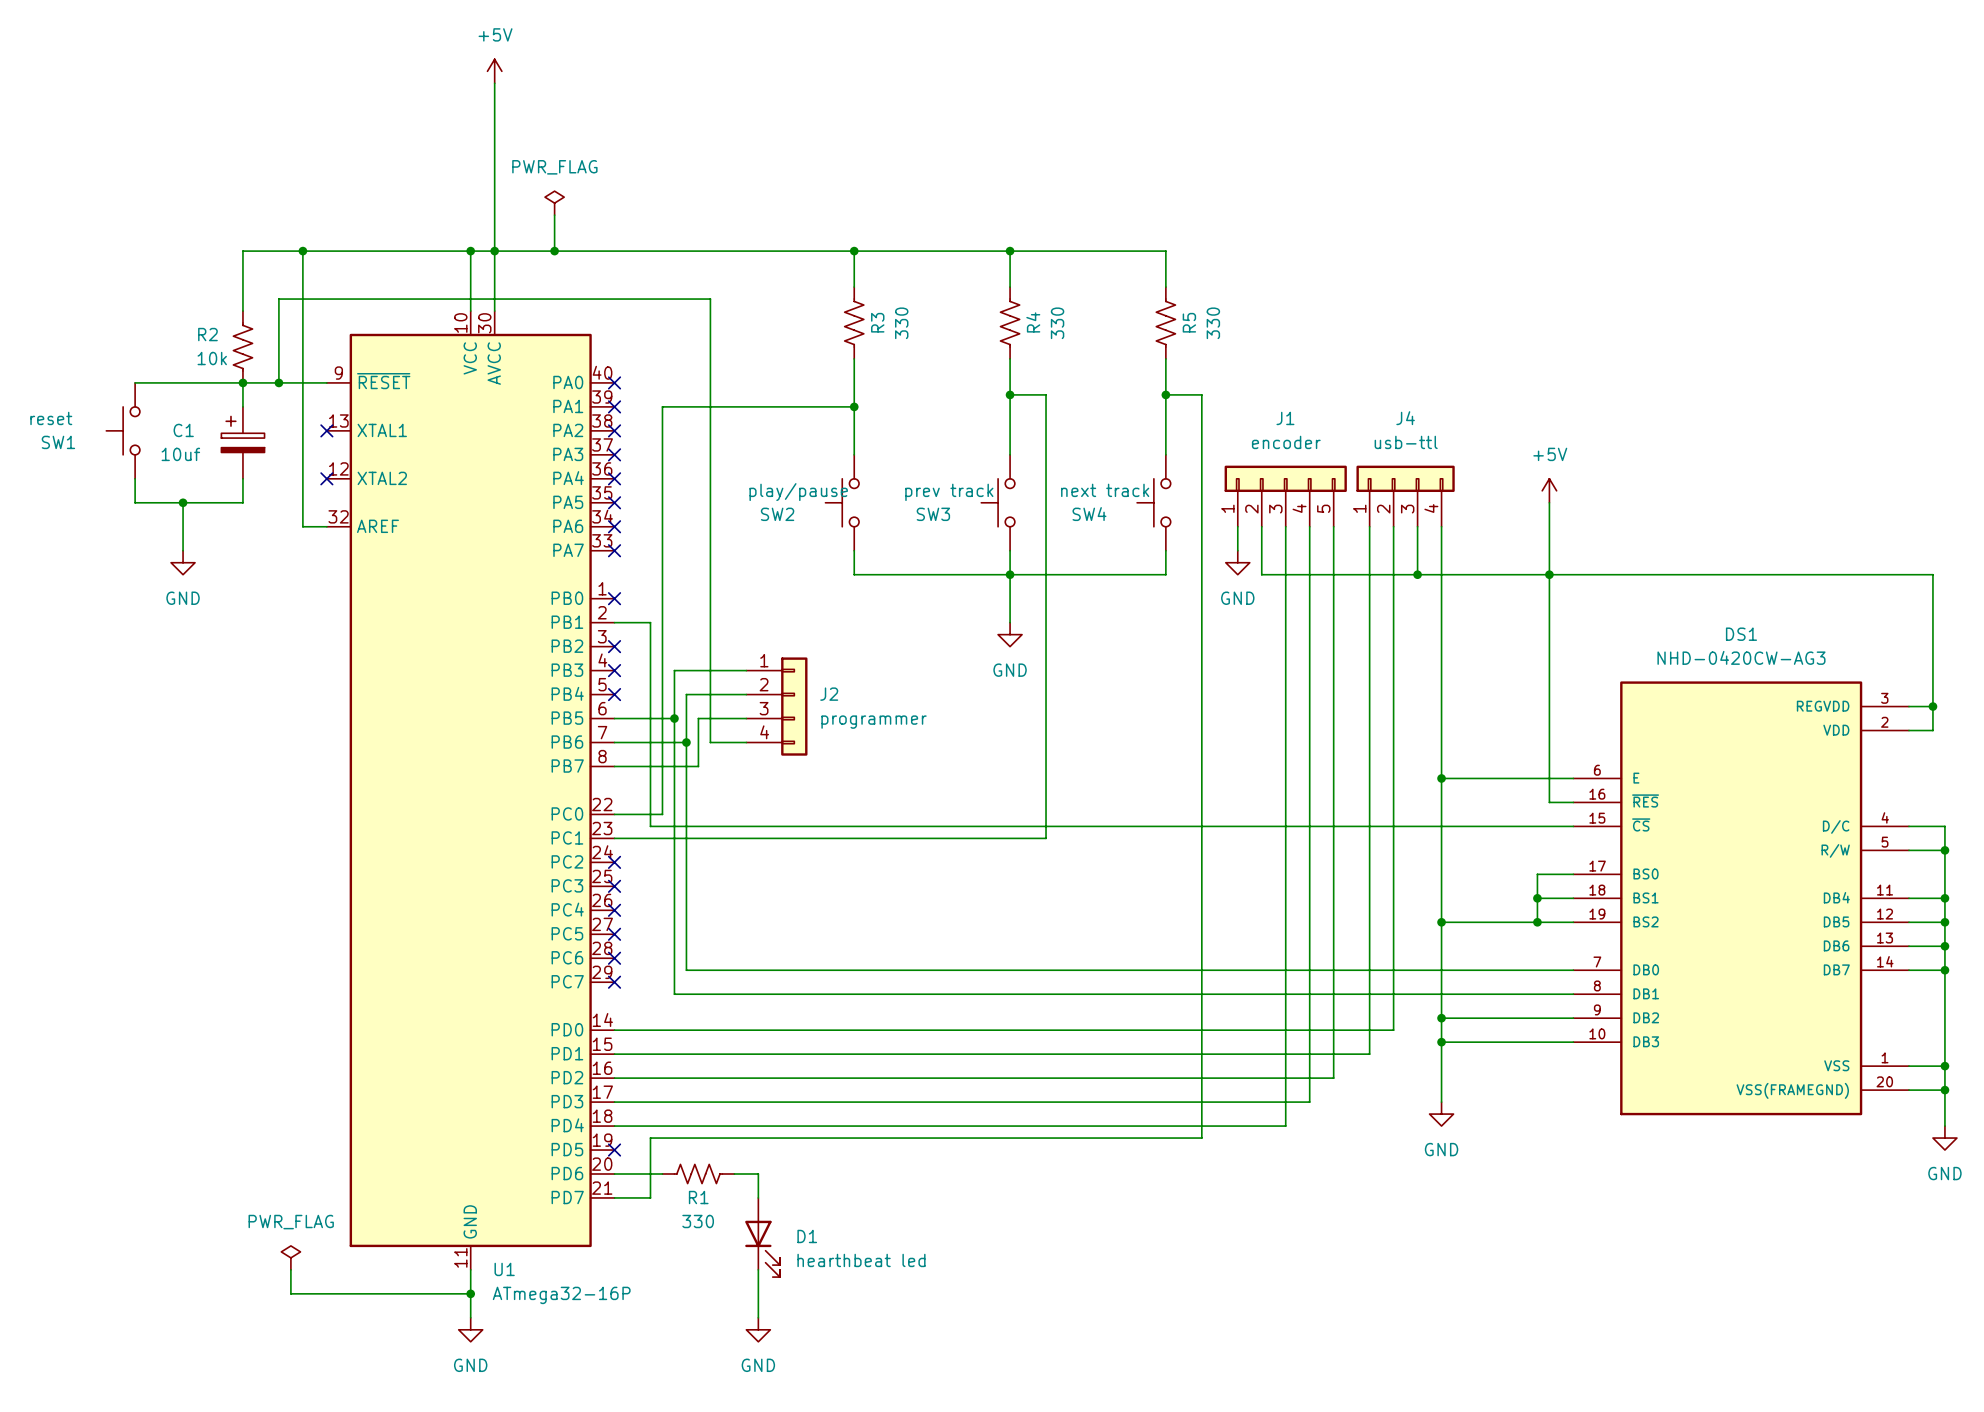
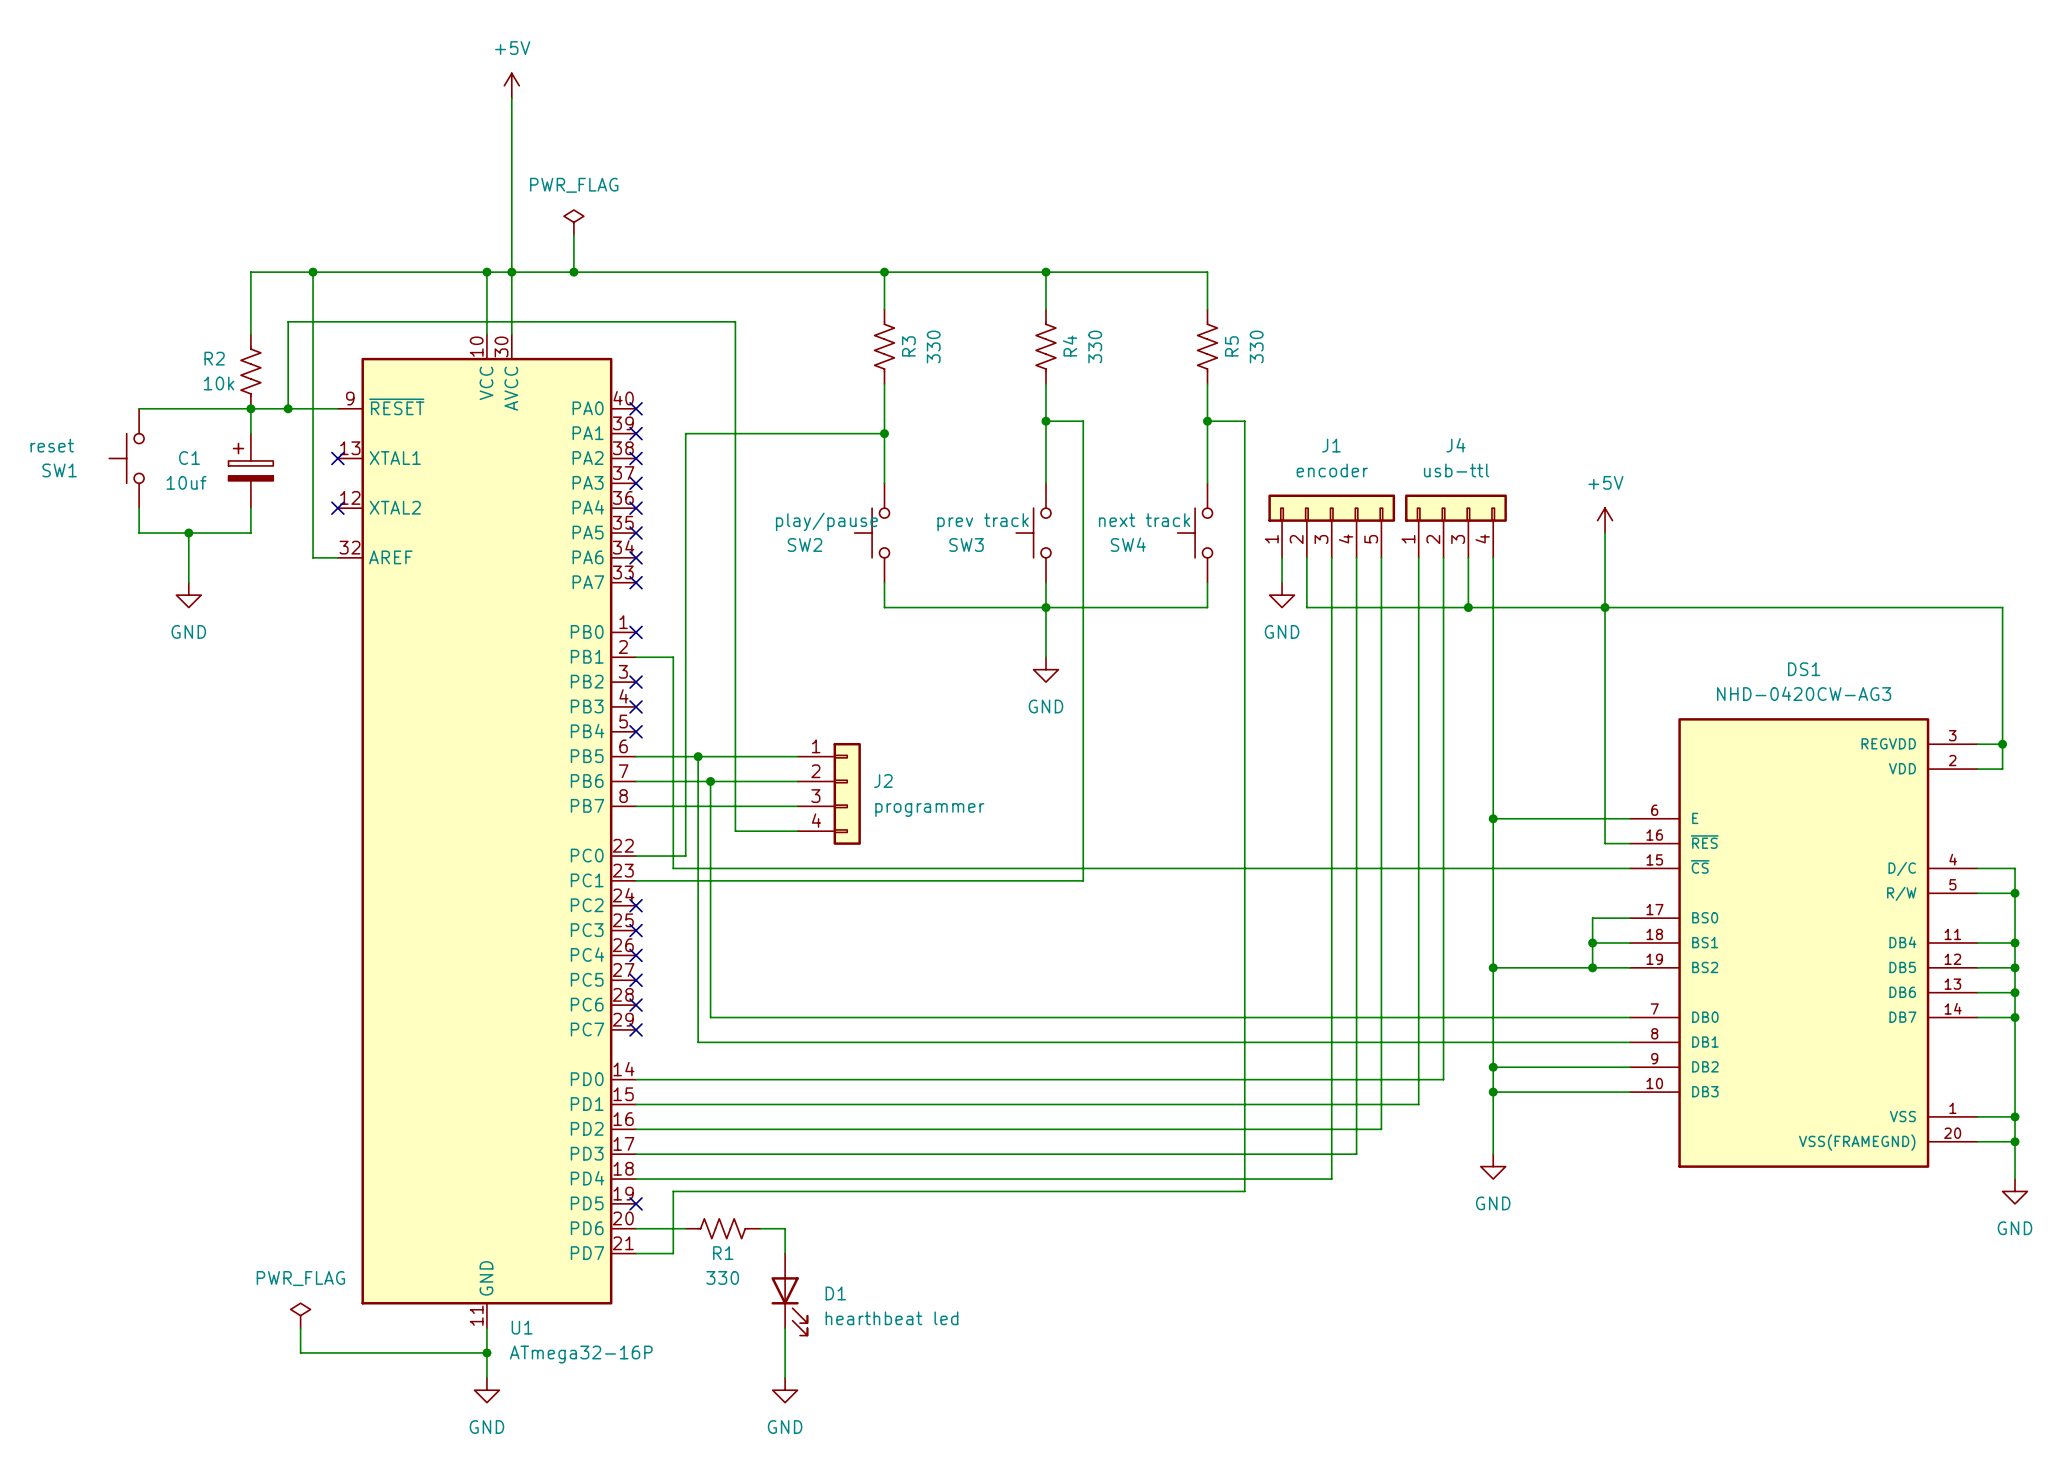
wire: (746, 670) (674, 670) (674, 718) -> none
wire: (746, 694) (686, 694) (686, 742) -> (797, 831) (735, 831) (735, 781) (710, 781)
J2 position: (776, 706) -> (829, 793)
wire: (698, 718) (698, 766) -> (722, 756) (698, 756)
wire: none -> (722, 806) (797, 806)

